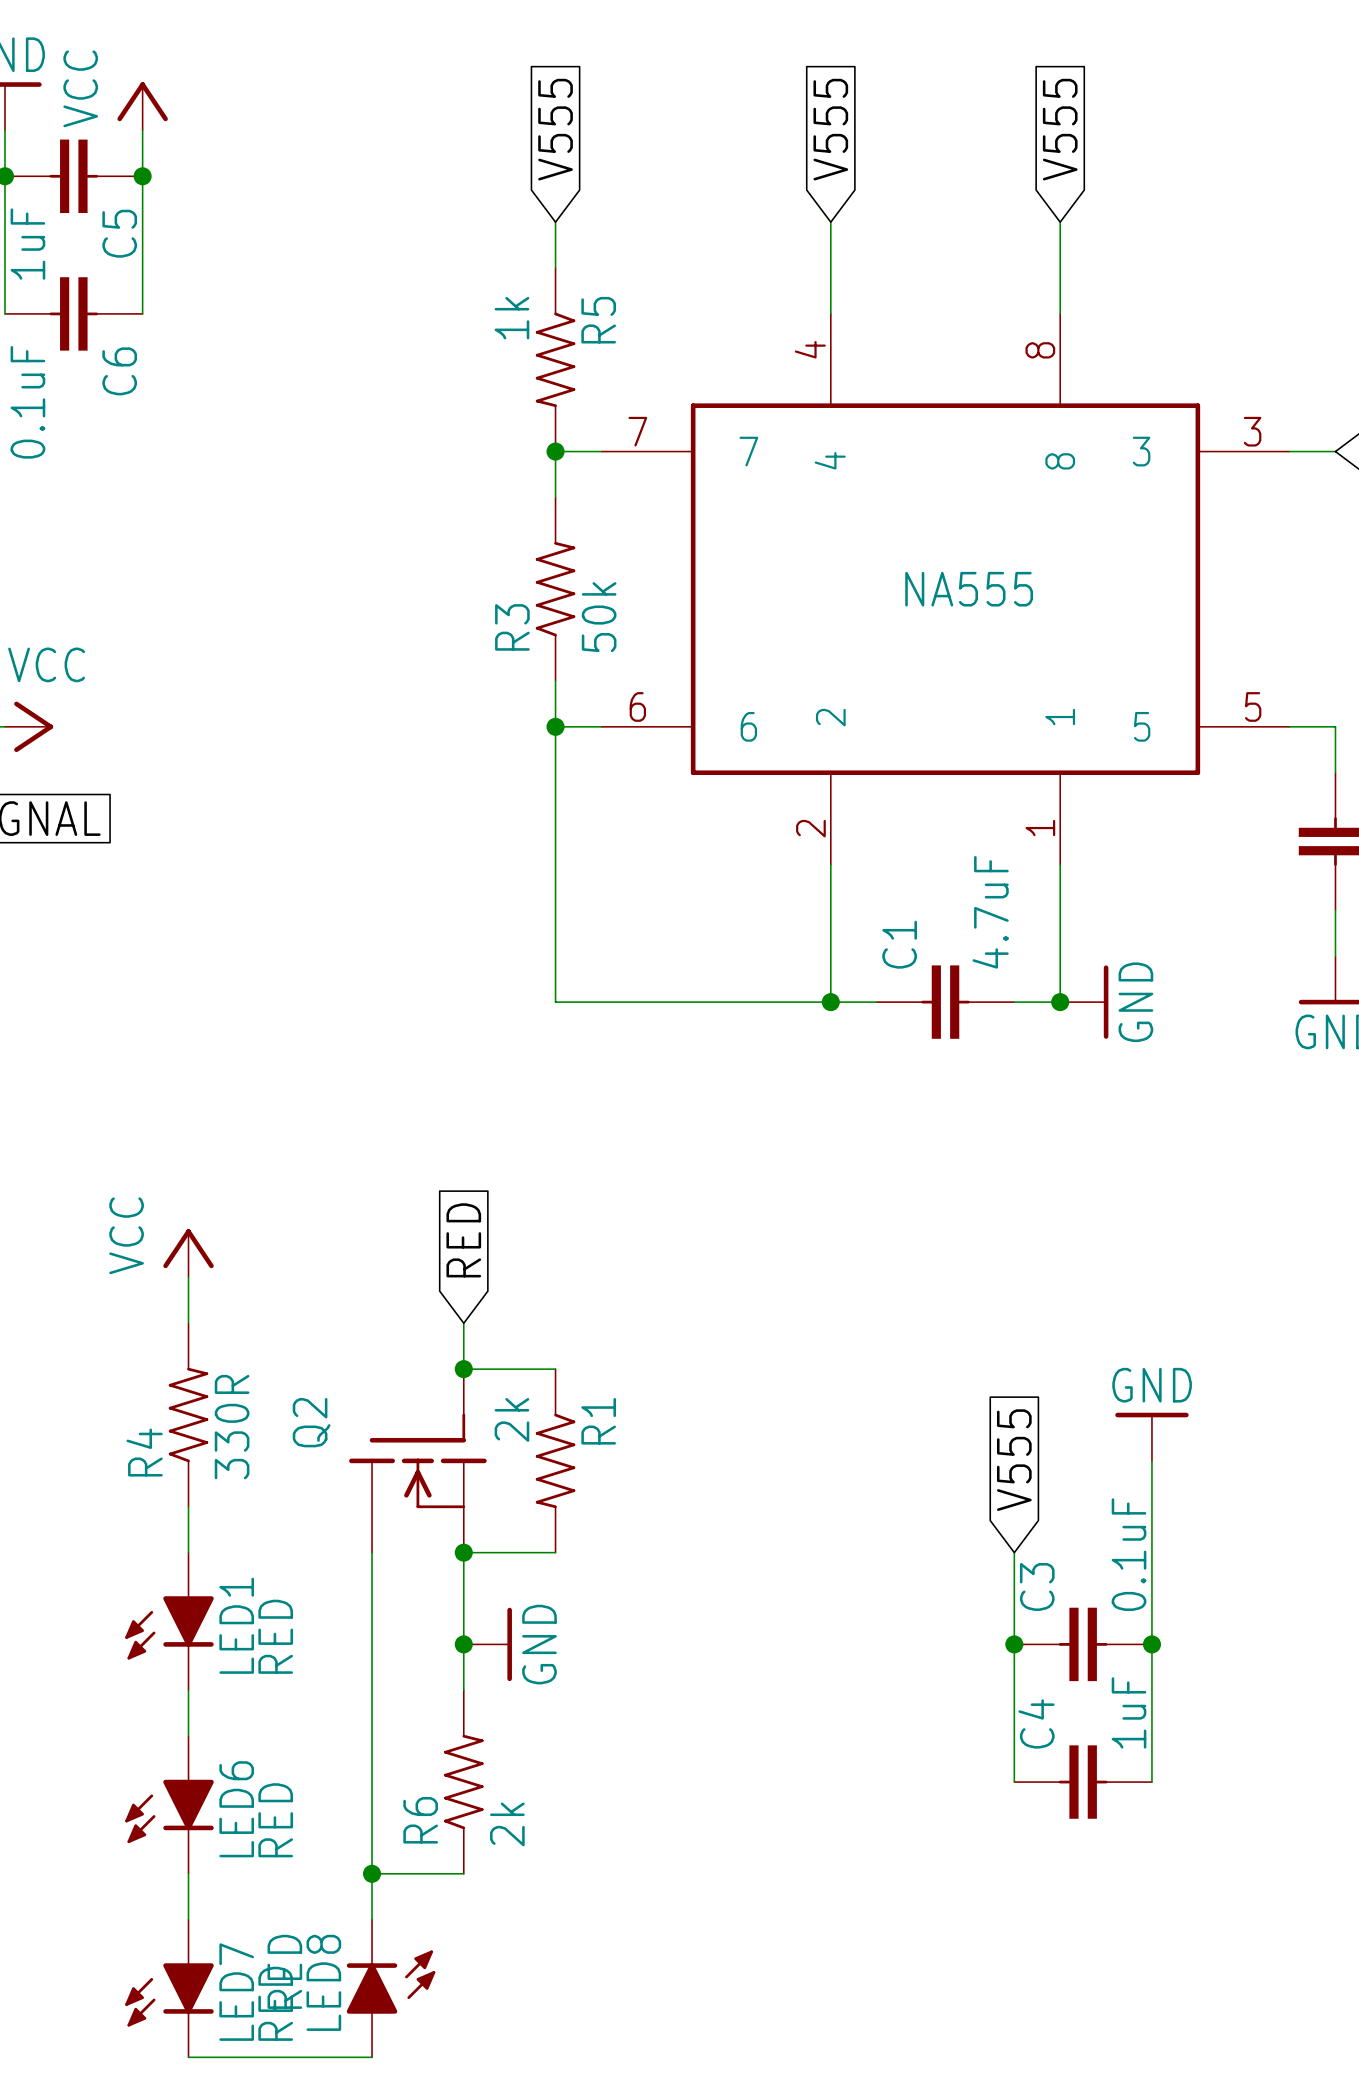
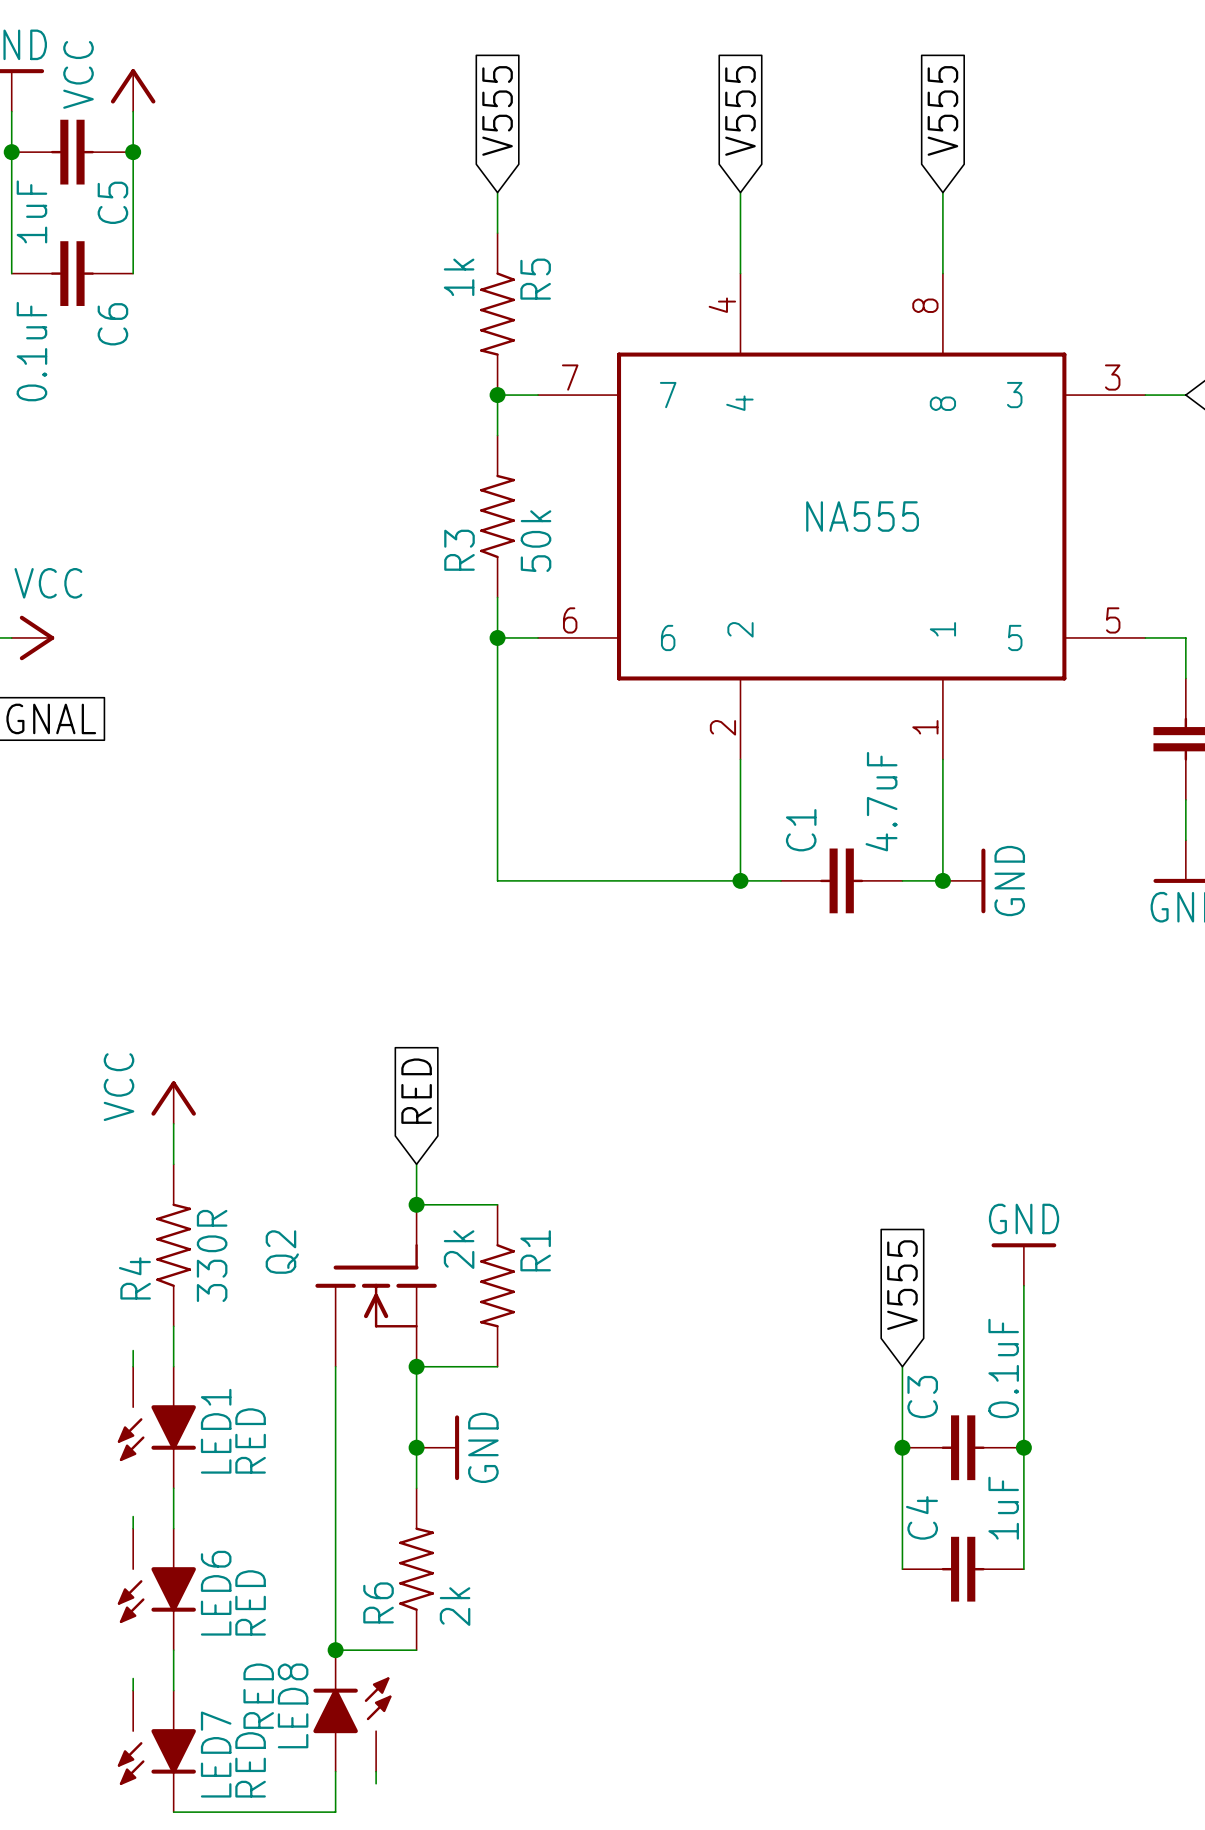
wire: none -> (133, 1350) (133, 1366)
LED1 symbol: [125, 1552, 214, 1691] -> [117, 1366, 196, 1489]
wire: none -> (133, 1516) (133, 1528)
LED6 symbol: [125, 1736, 214, 1874] -> [117, 1528, 196, 1651]
wire: none -> (133, 1678) (133, 1690)
LED7 symbol: [125, 1919, 214, 2058] -> [117, 1690, 196, 1813]
LED8 symbol: [346, 1919, 436, 2058] -> [313, 1650, 392, 1772]
wire: none -> (376, 1771) (376, 1783)

